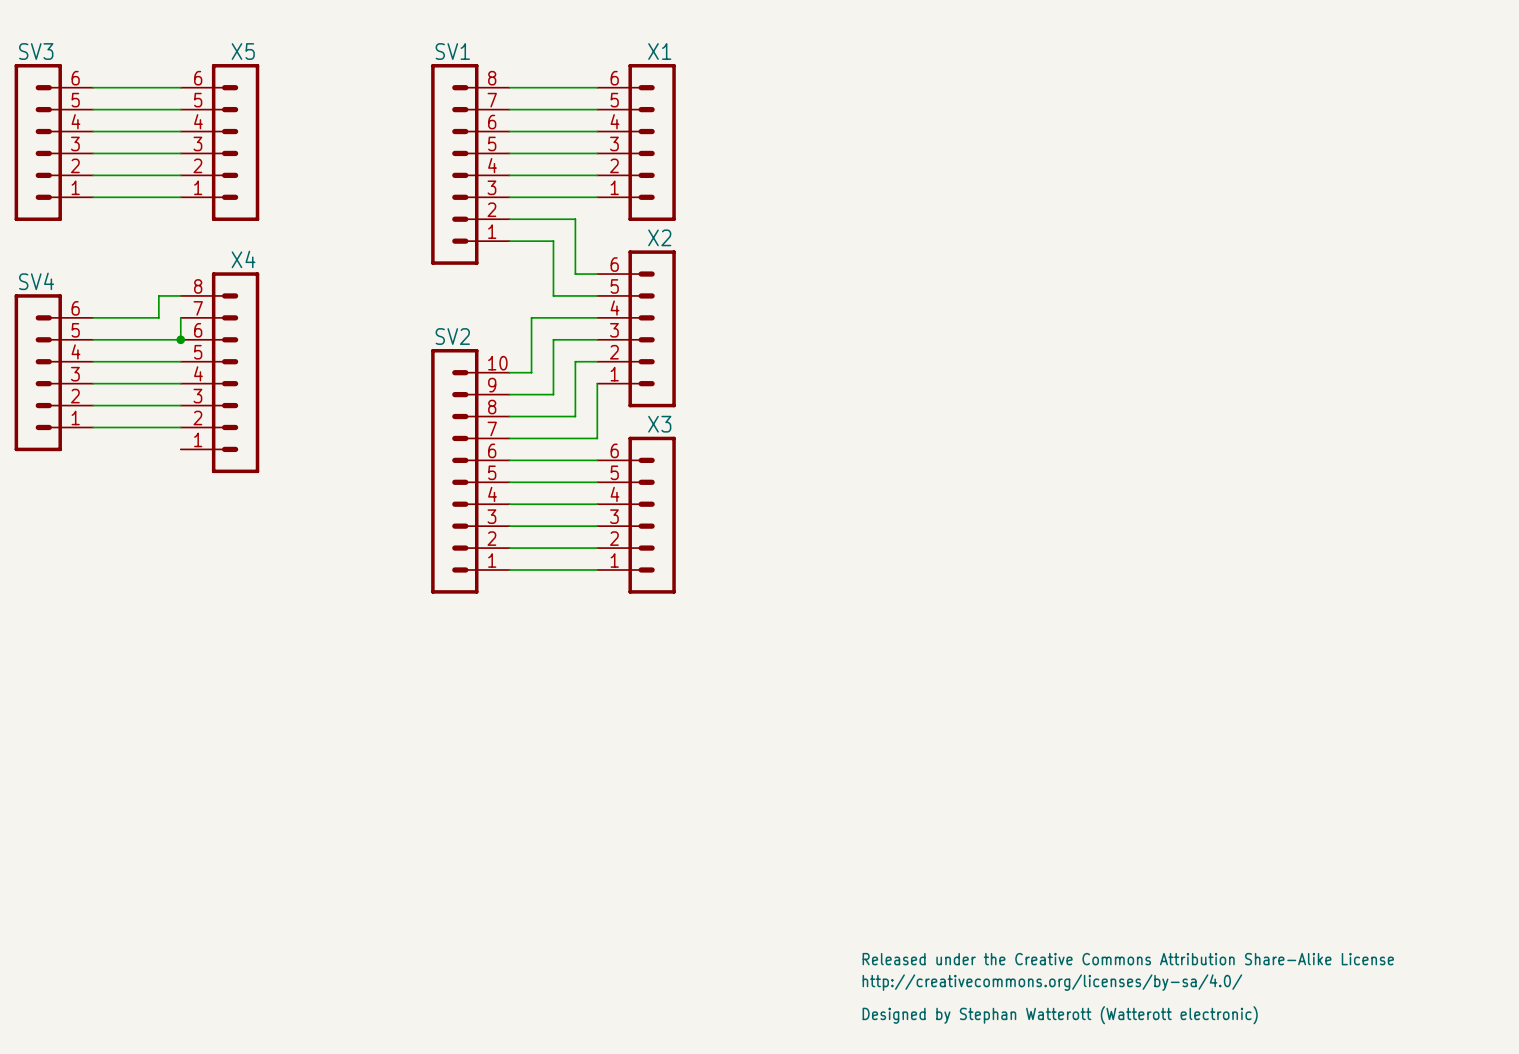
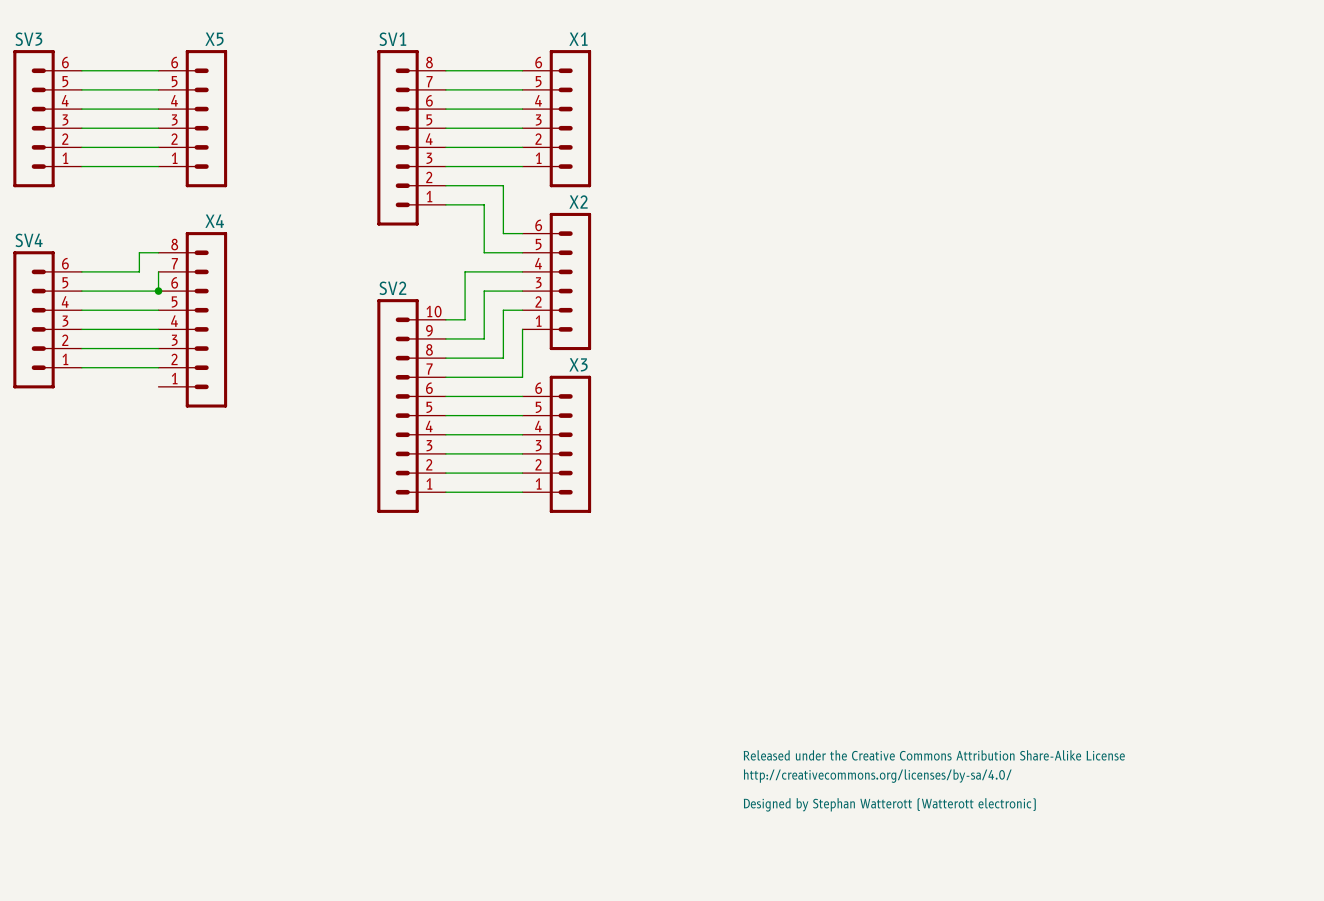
text position: Released under the Creative Commons Attribution Share-Alike License (1128, 959) -> Released under the Creative Commons Attribution Share-Alike License (934, 755)
text position: http://creativecommons.org/licenses/by-sa/4.0/ (1052, 982) -> http://creativecommons.org/licenses/by-sa/4.0/ (877, 776)
text position: Designed by Stephan Watterott (Watterott electronic) (1060, 1015) -> Designed by Stephan Watterott (Watterott electronic) (889, 804)

